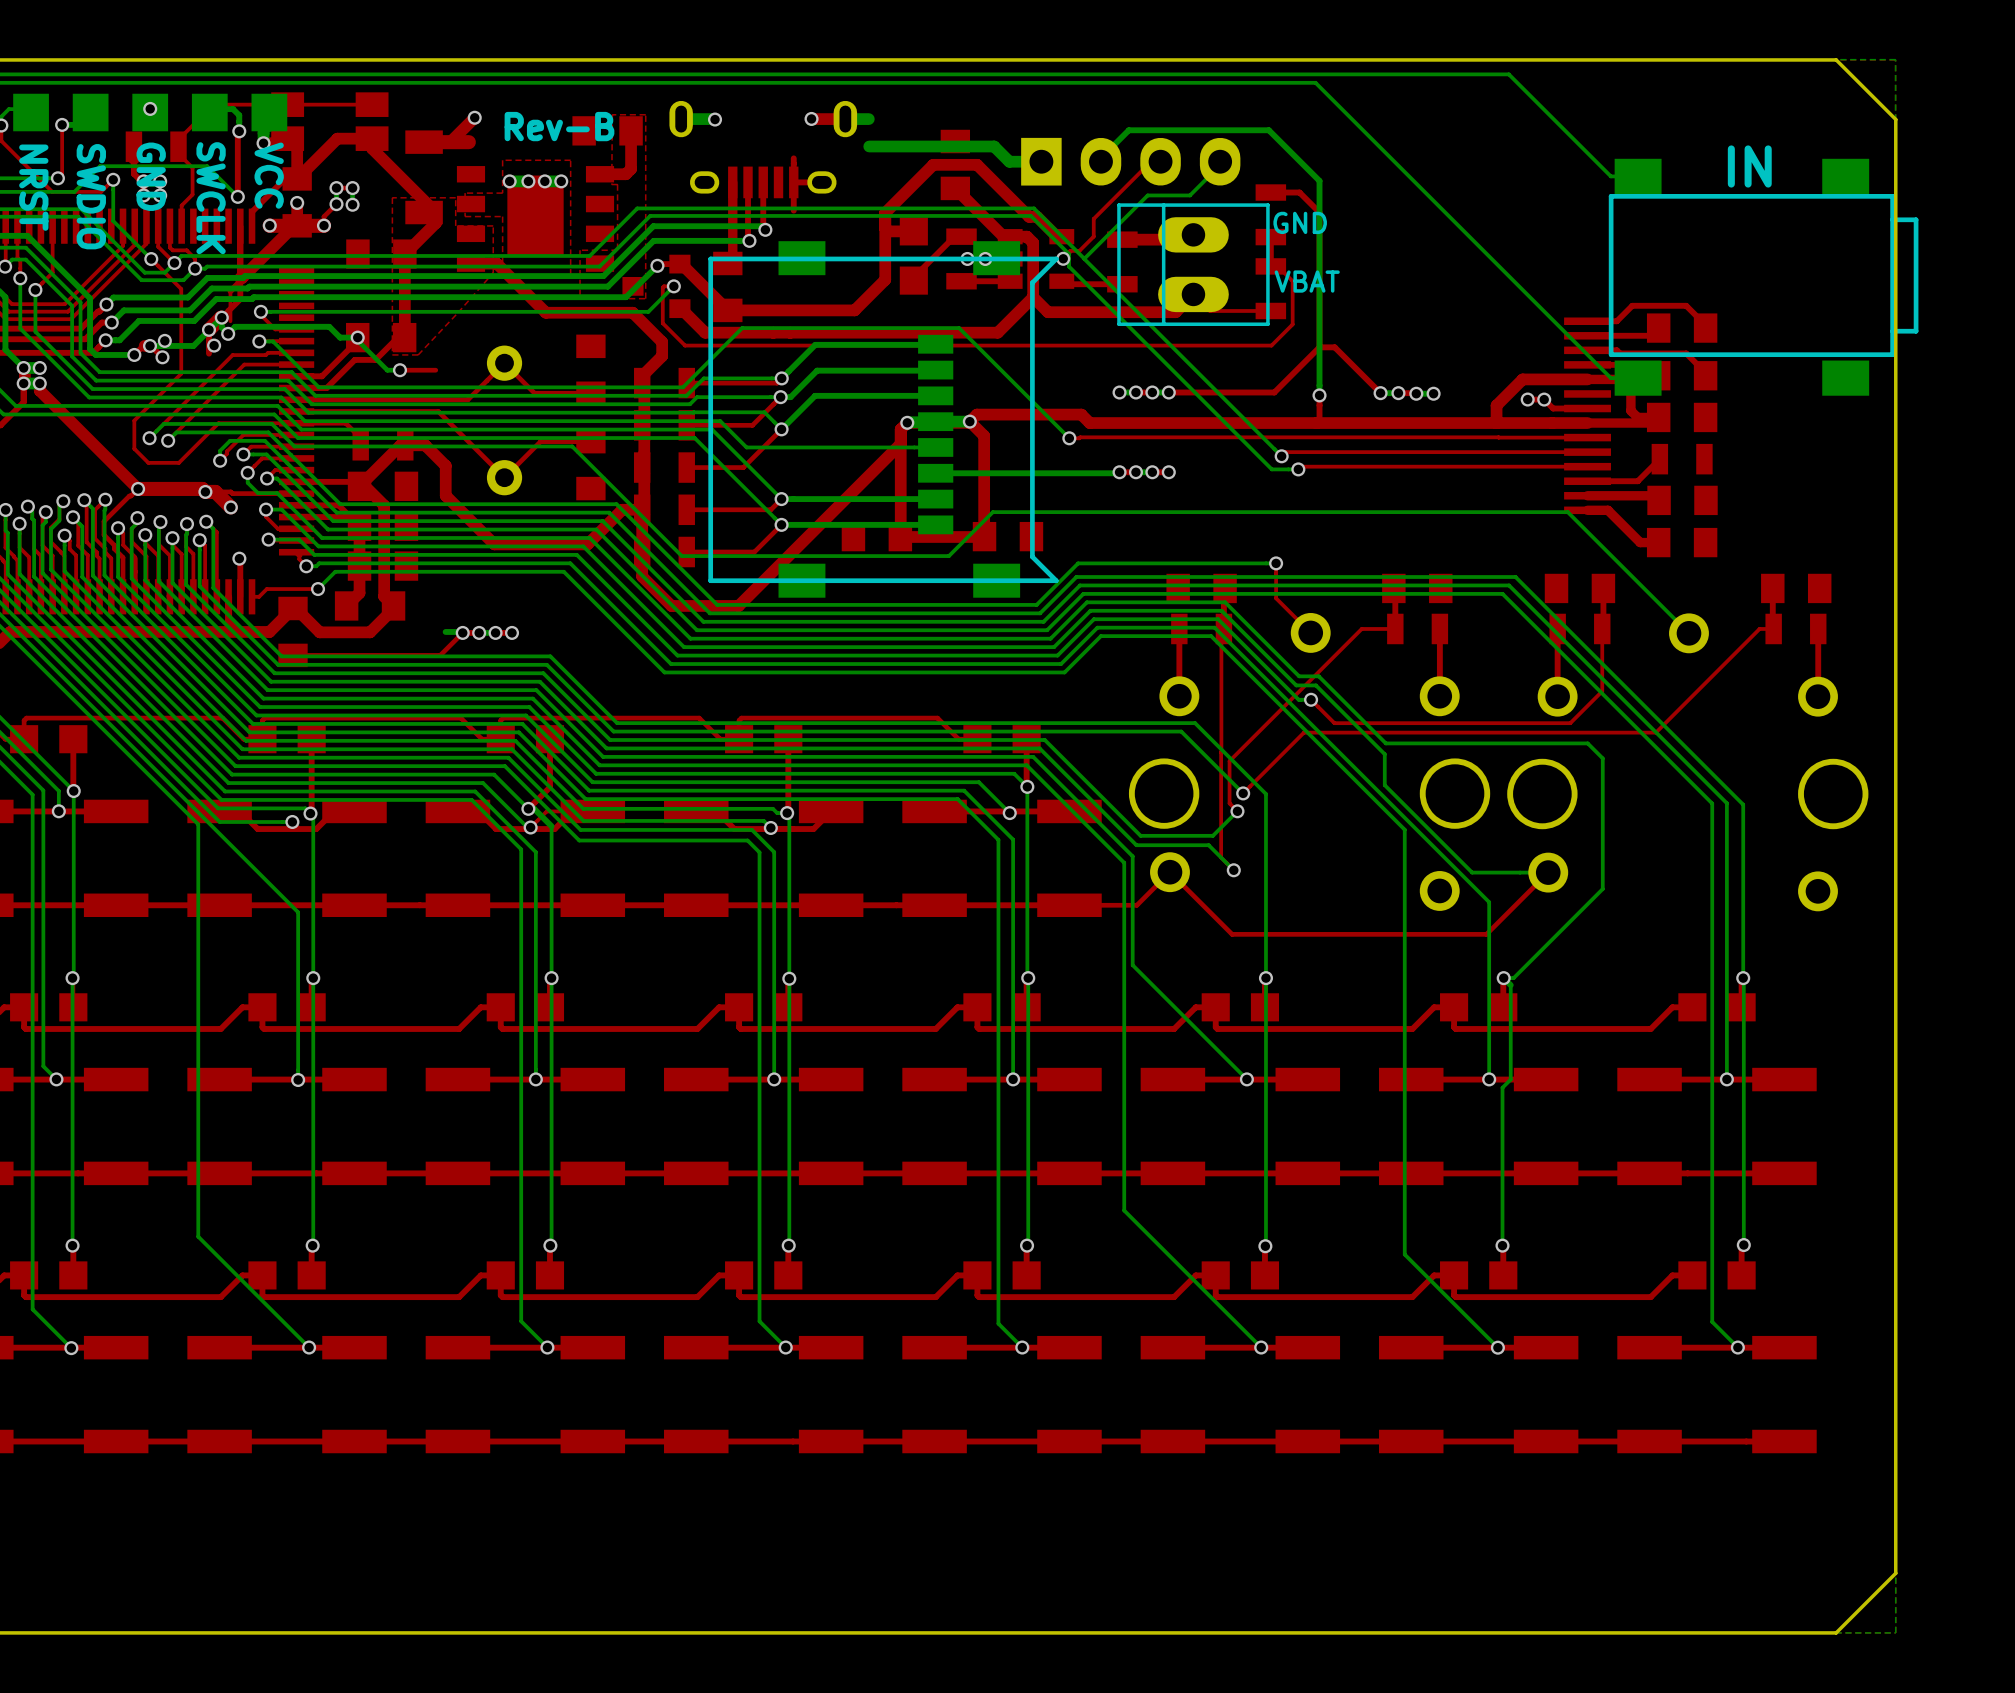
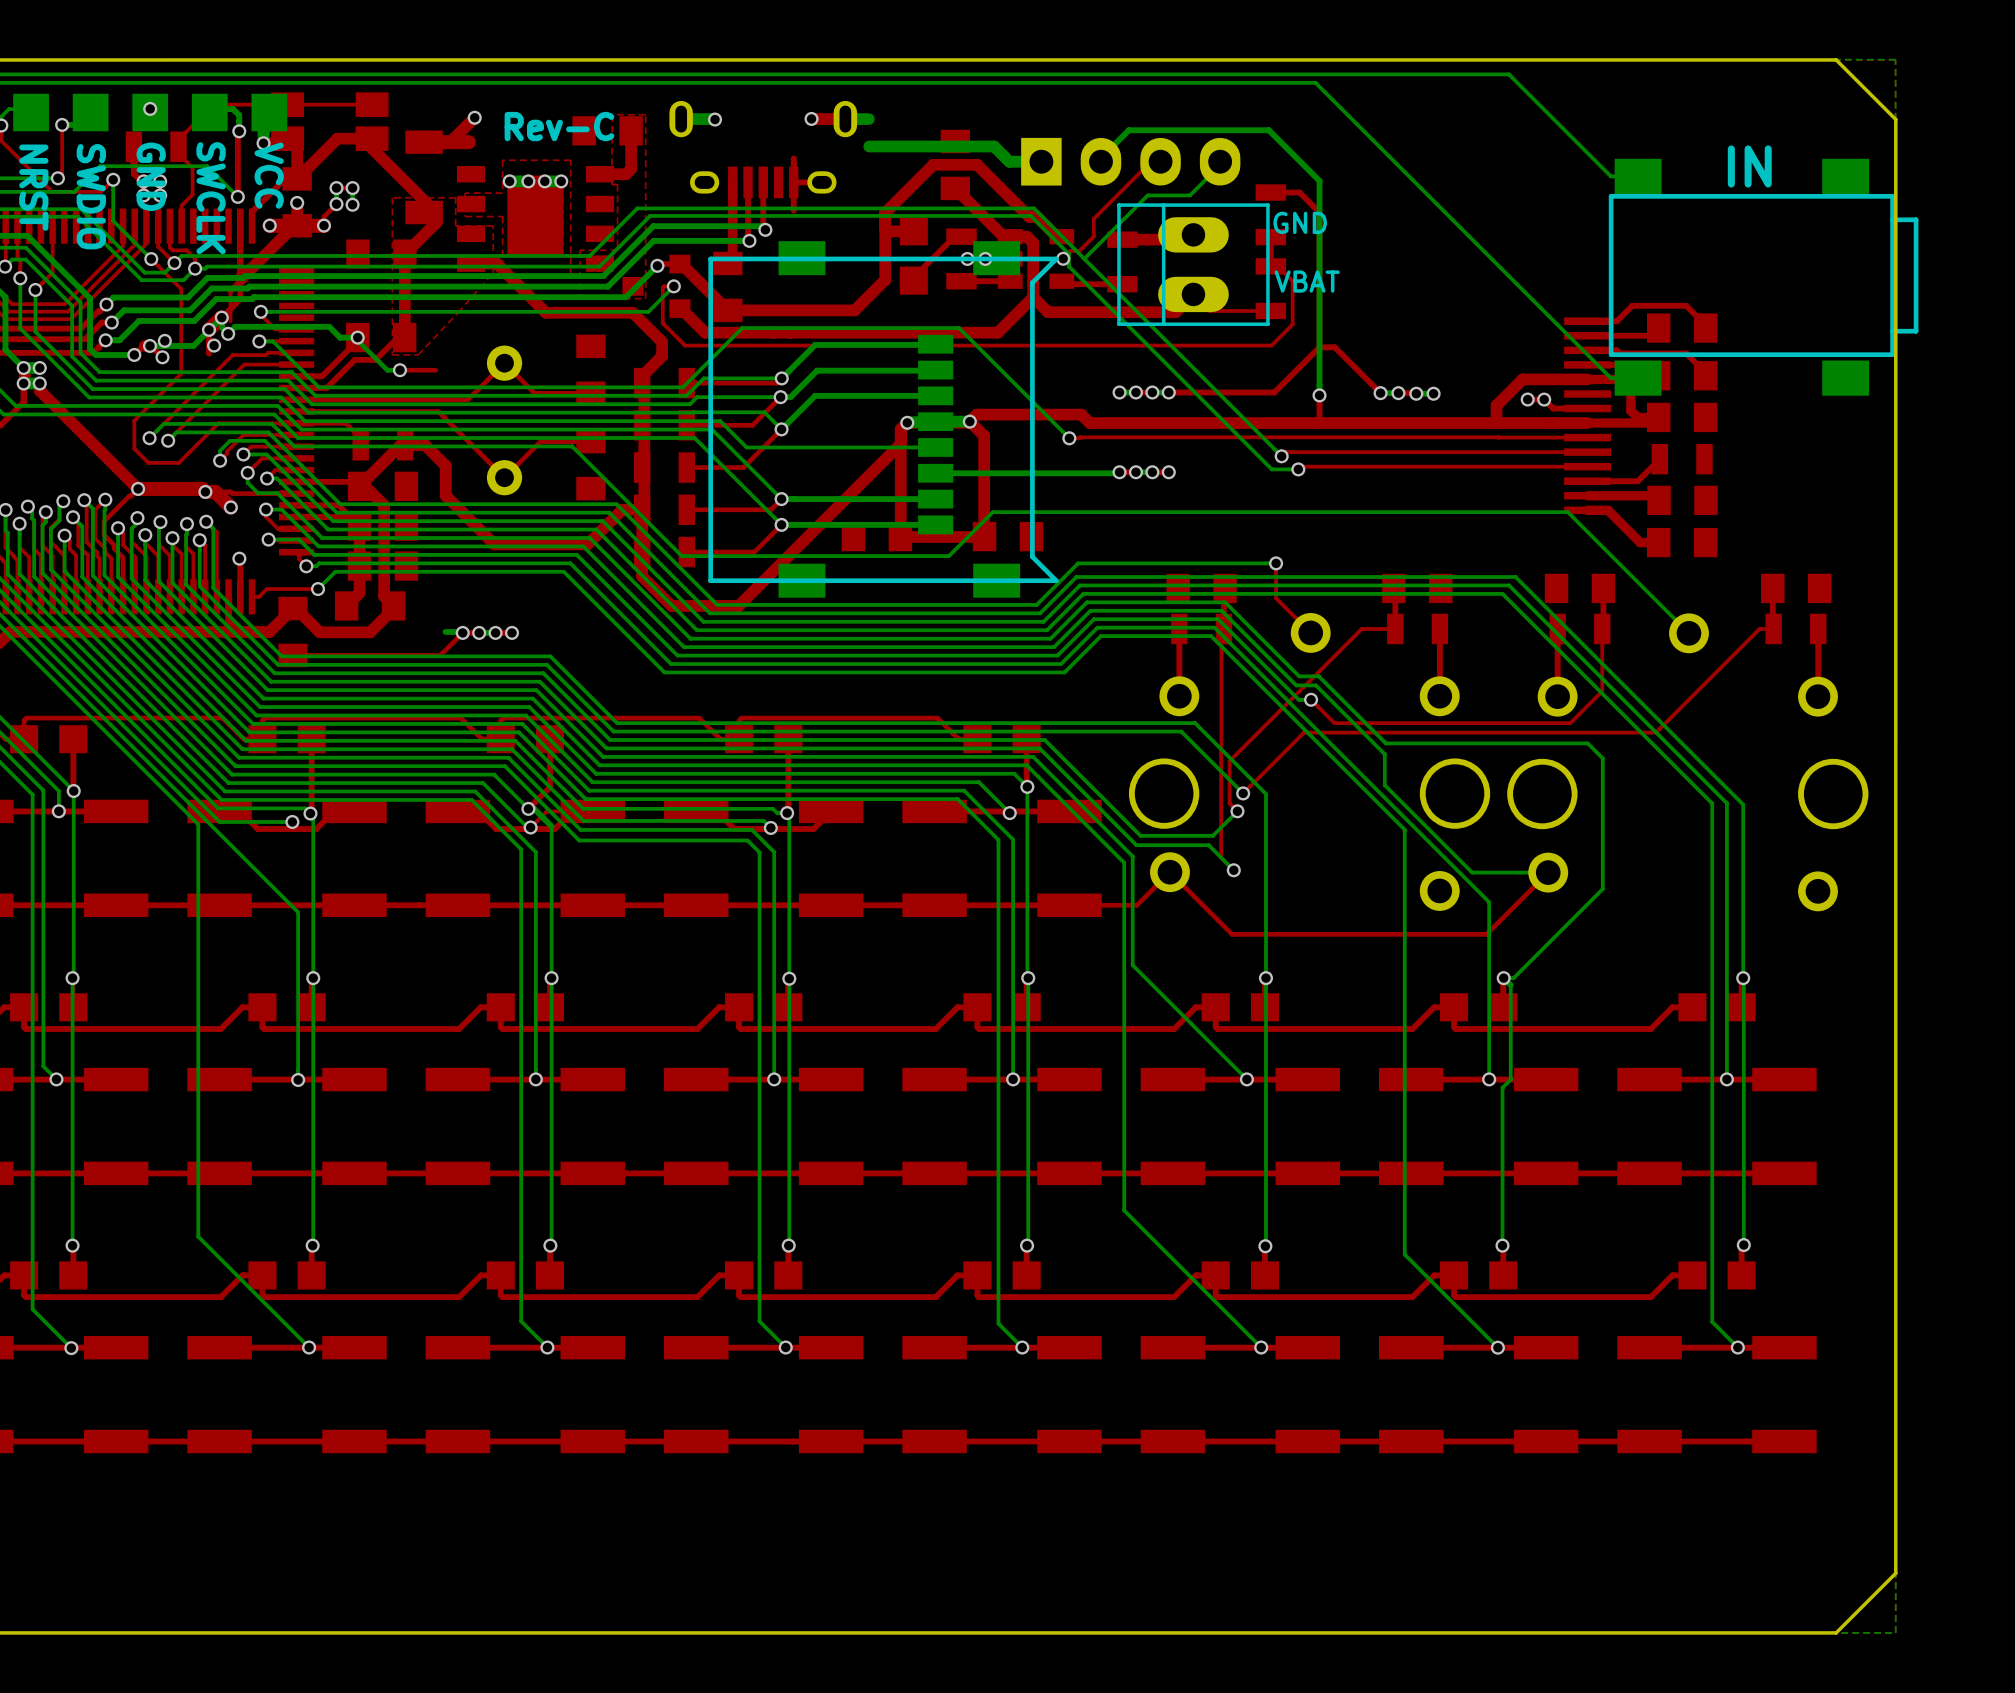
text: Rev-B (559, 126) -> Rev-C (559, 126)

